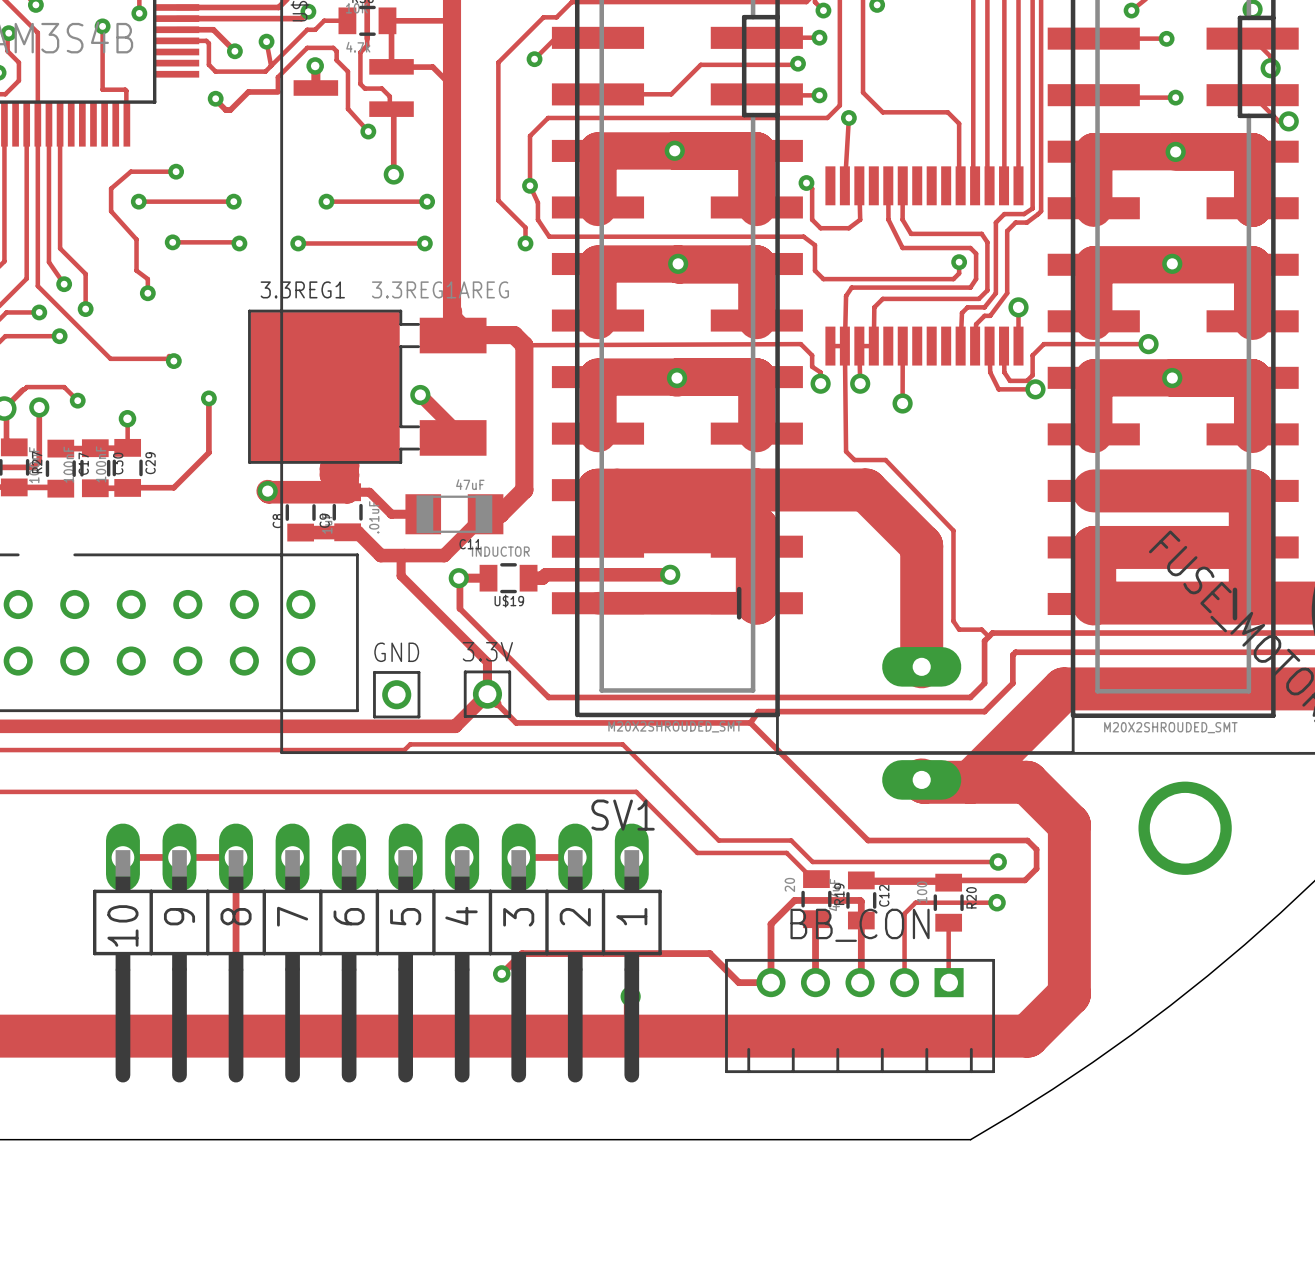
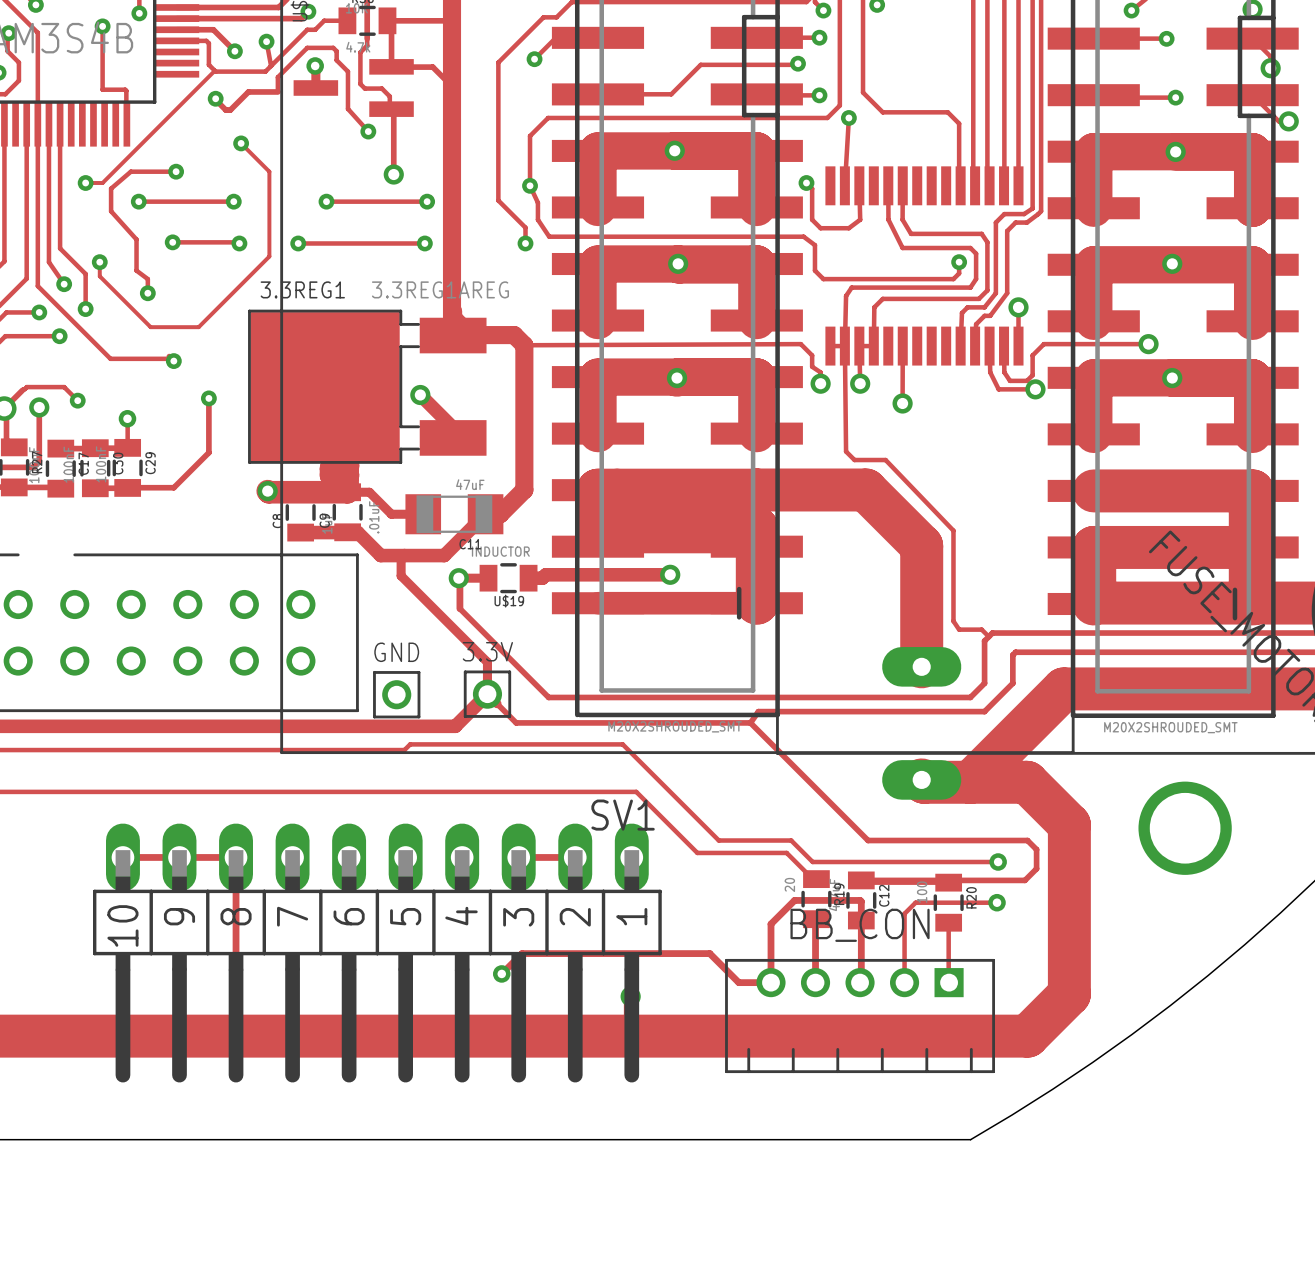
track: none -> (214, 70) (102, 182) (85, 182)
track: none -> (241, 143) (269, 171) (269, 256) (198, 327) (150, 327) (99, 276) (99, 262)
via: none -> (241, 143)
via: none -> (85, 182)
via: none -> (99, 262)

